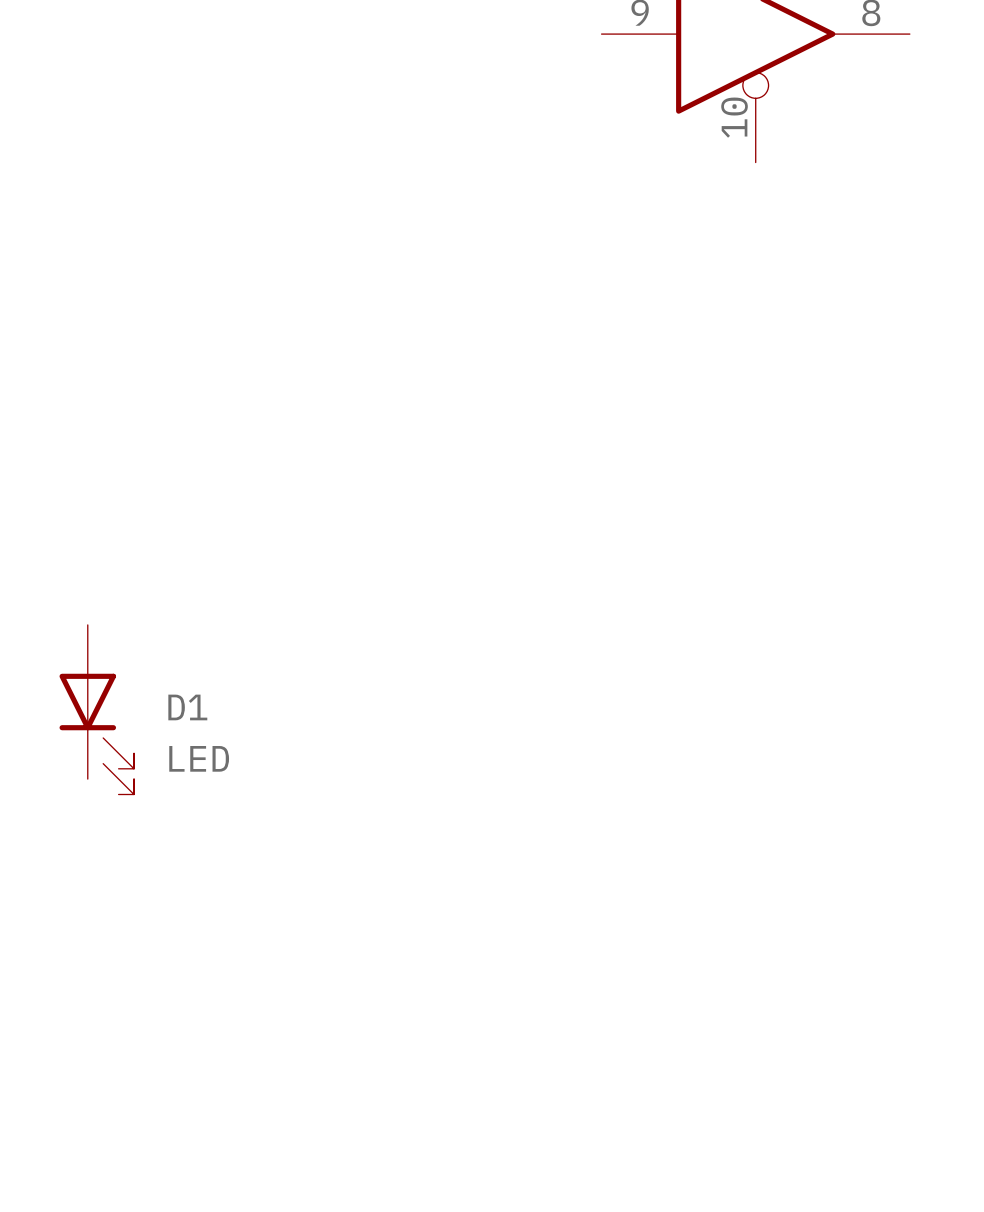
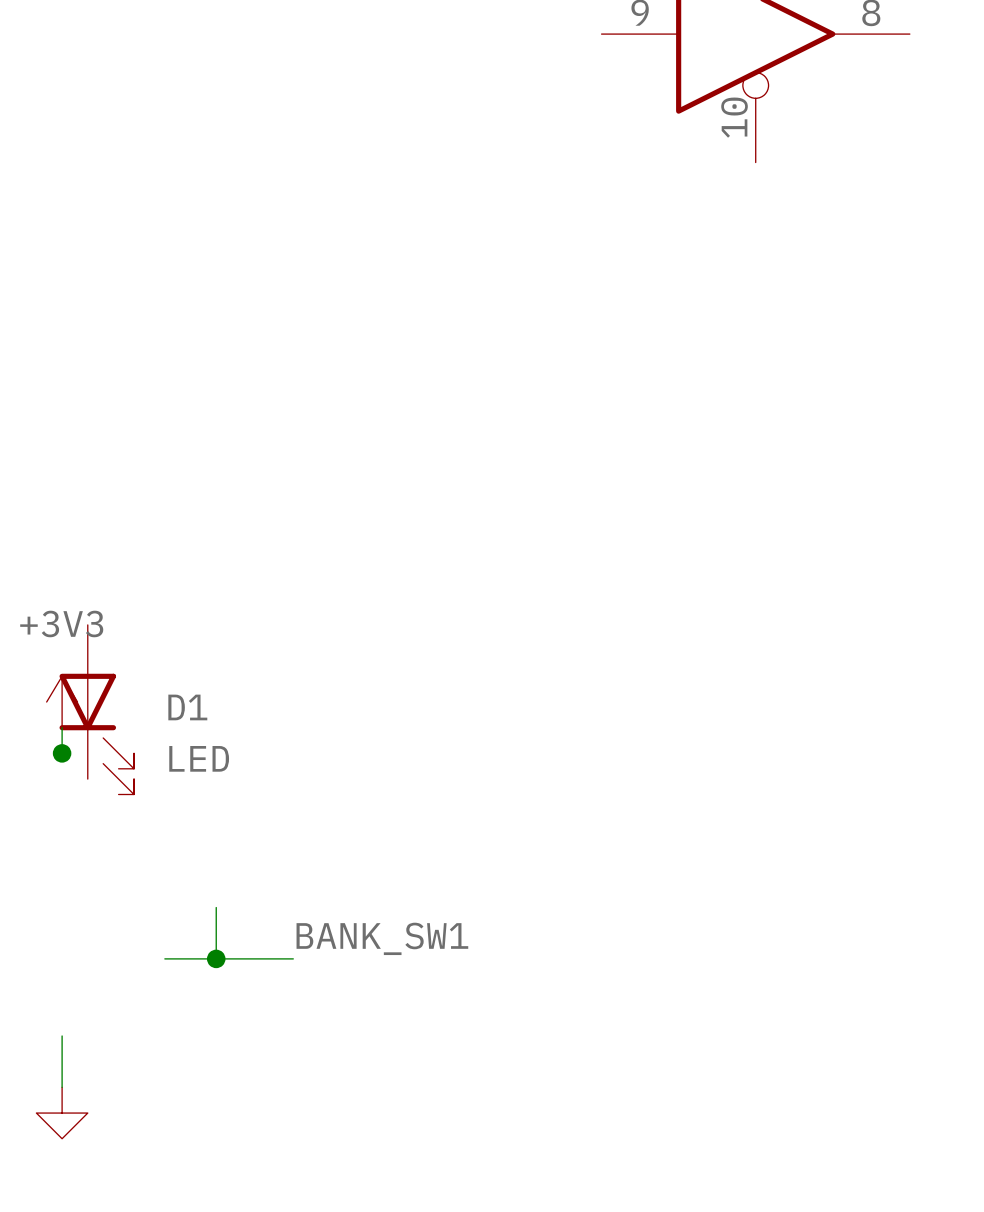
power symbol: none -> +3V3 (62, 702)
wire: none -> (62, 727) (62, 753)
junction: none -> (62, 753)
wire: none -> (216, 907) (216, 958)
label: none -> BANK_SW1 (382, 938)
wire: none -> (164, 958) (293, 958)
junction: none -> (216, 958)
wire: none -> (62, 1035) (62, 1087)
power symbol: none -> (62, 1113)

